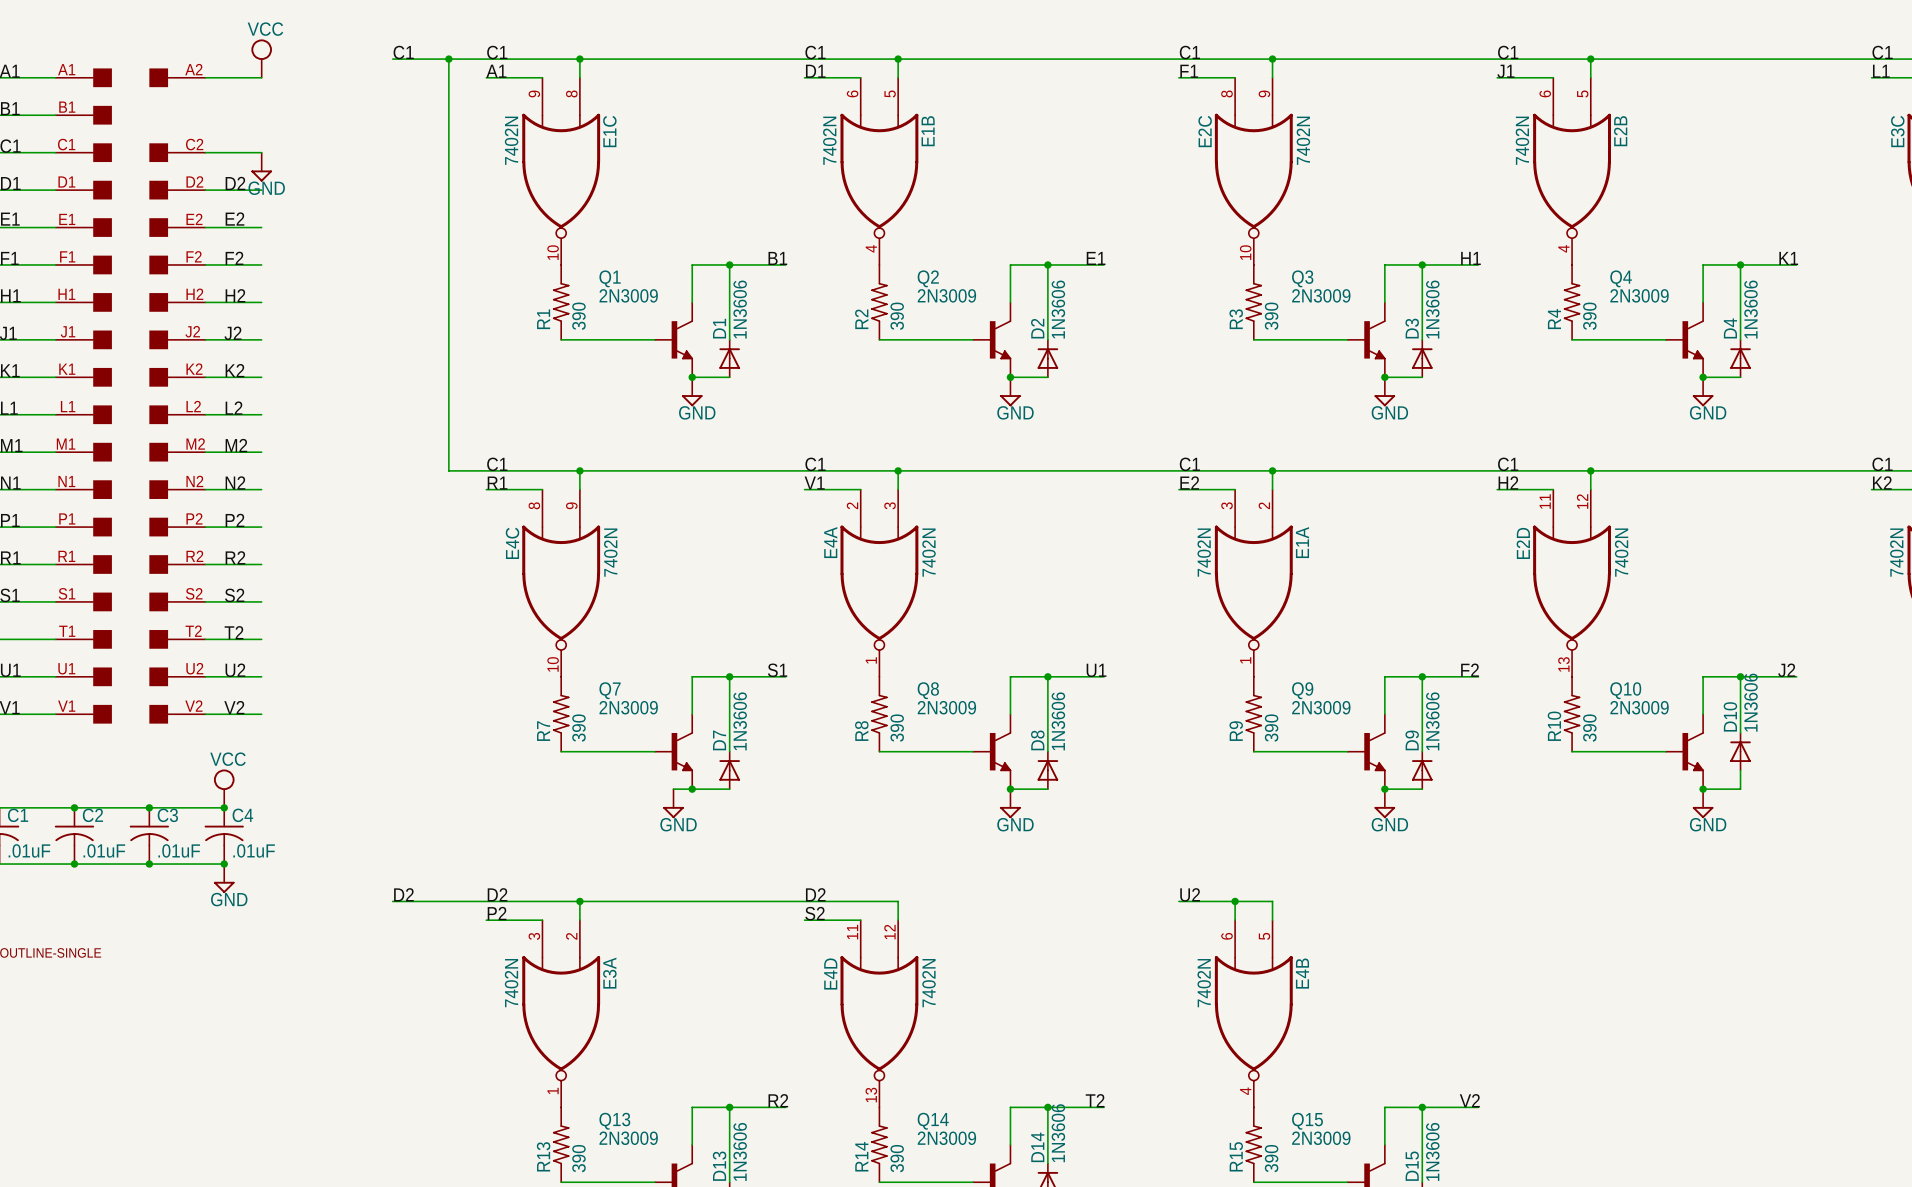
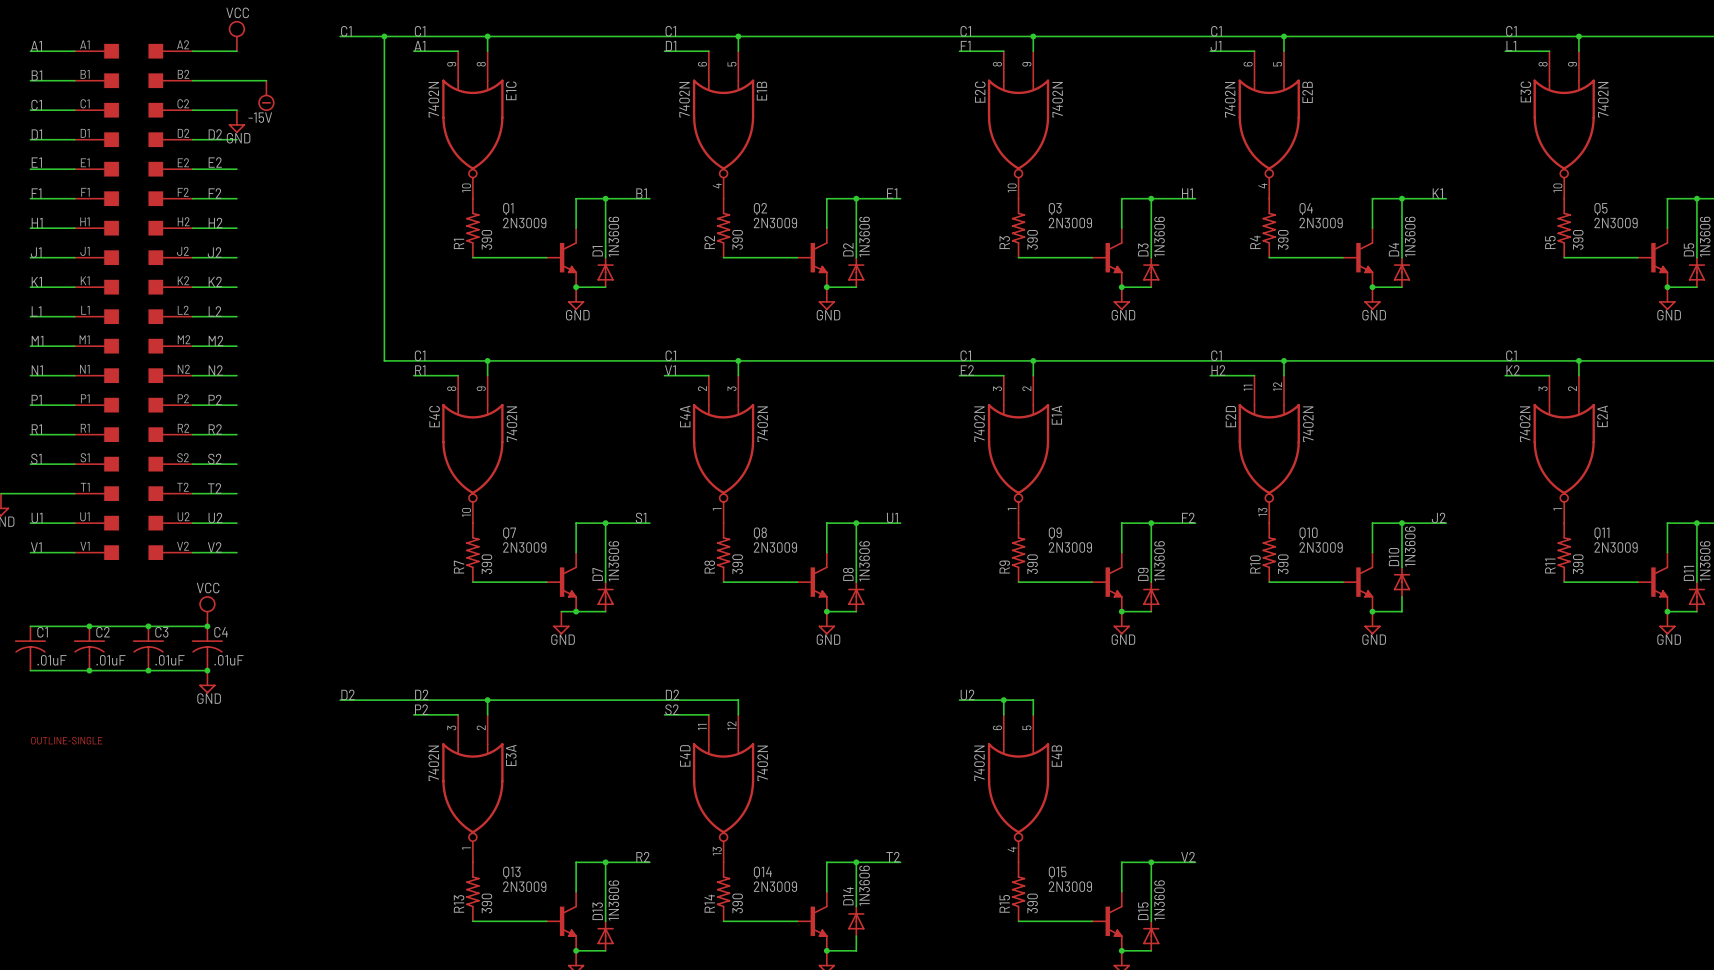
part: none -> (170, 80)
wire: none -> (192, 80) (266, 80)
power symbol: none -> -15V (266, 95)

